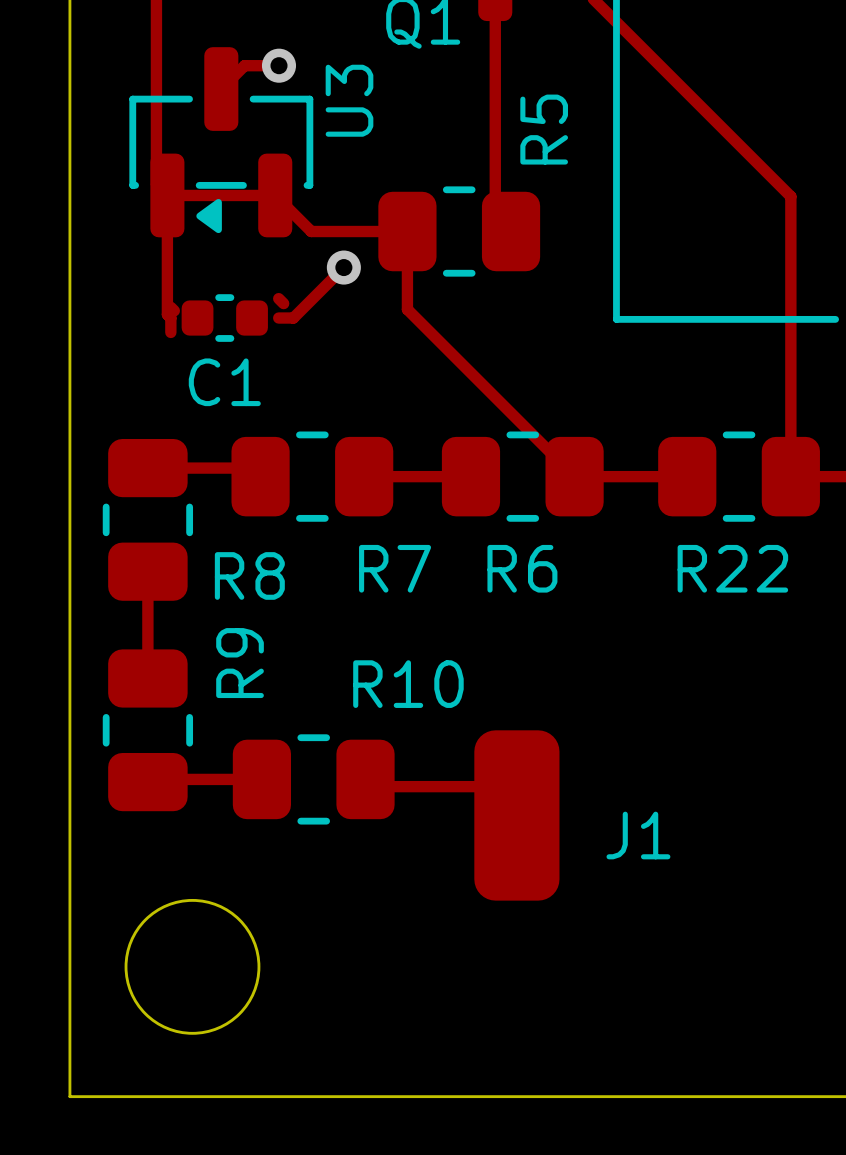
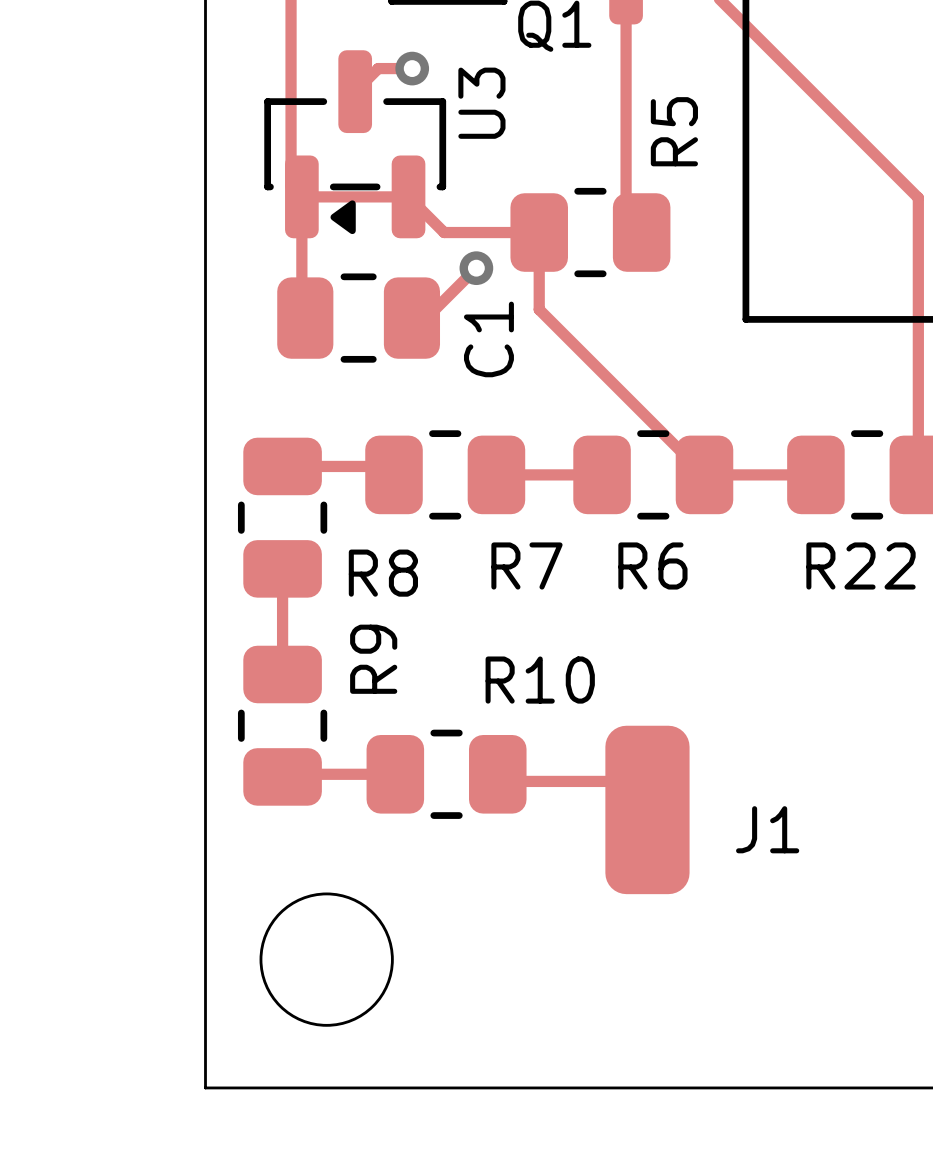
C1 footprint: [181, 294, 268, 342] -> [277, 273, 441, 363]
C1 name rotation: 0° (224, 382) -> 90° counterclockwise (488, 339)
C1 name position: C1 (224, 382) -> C1 (488, 339)

